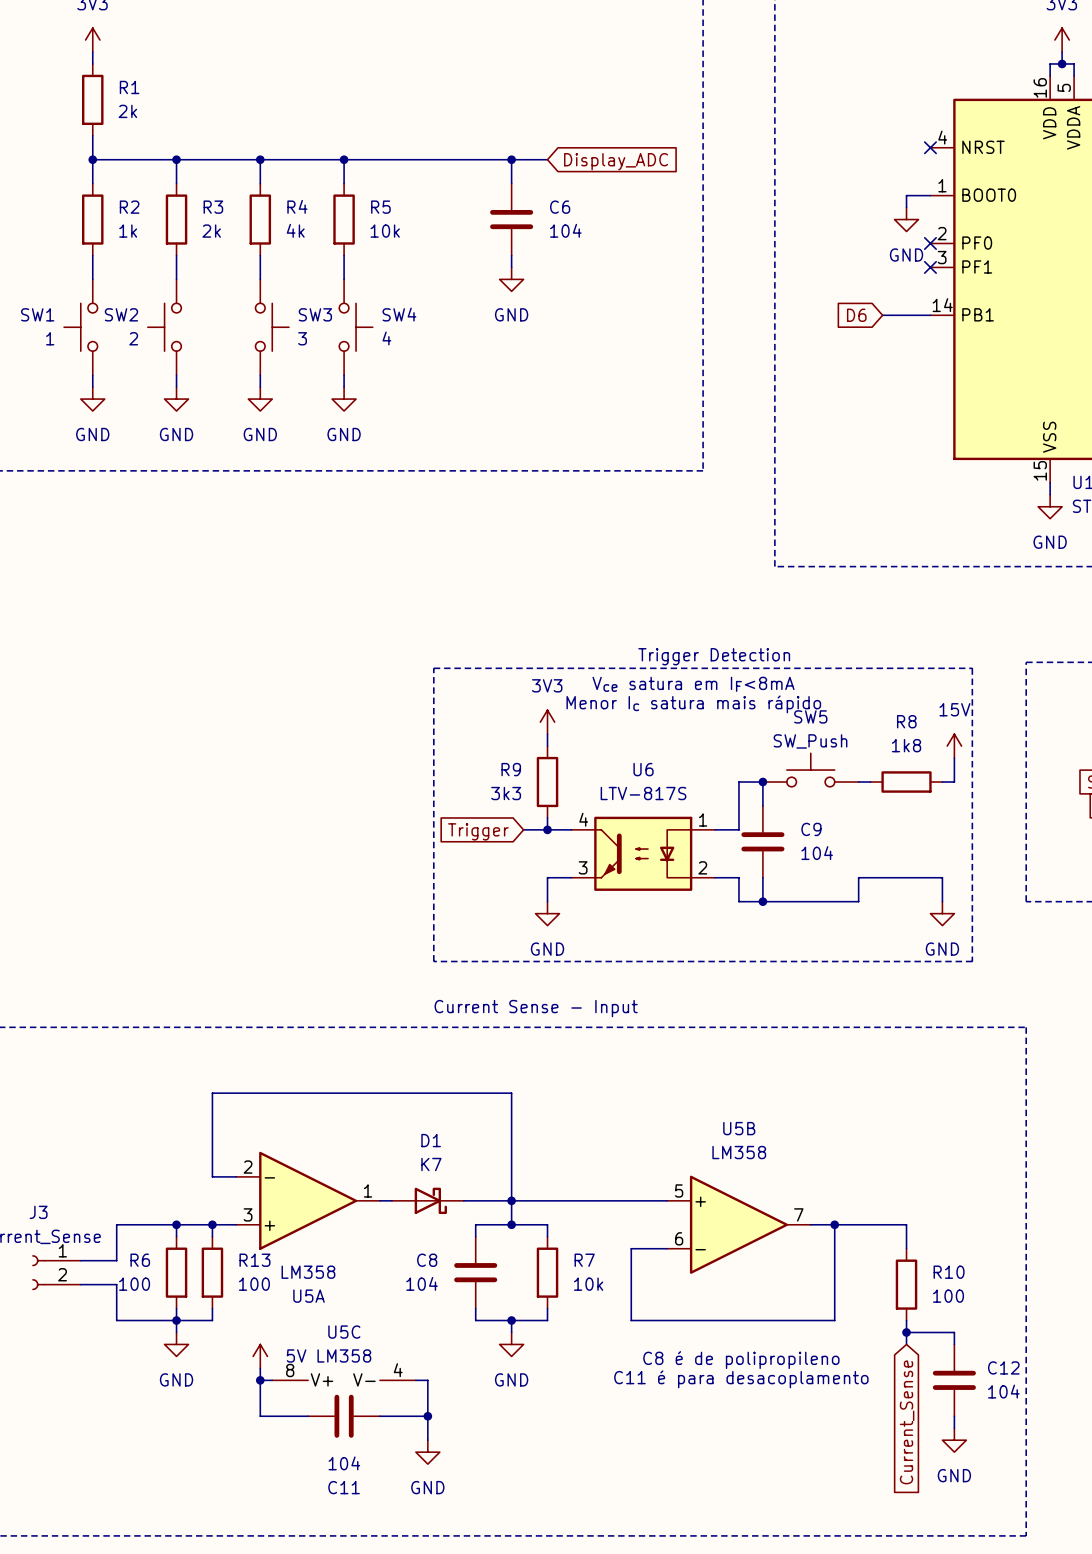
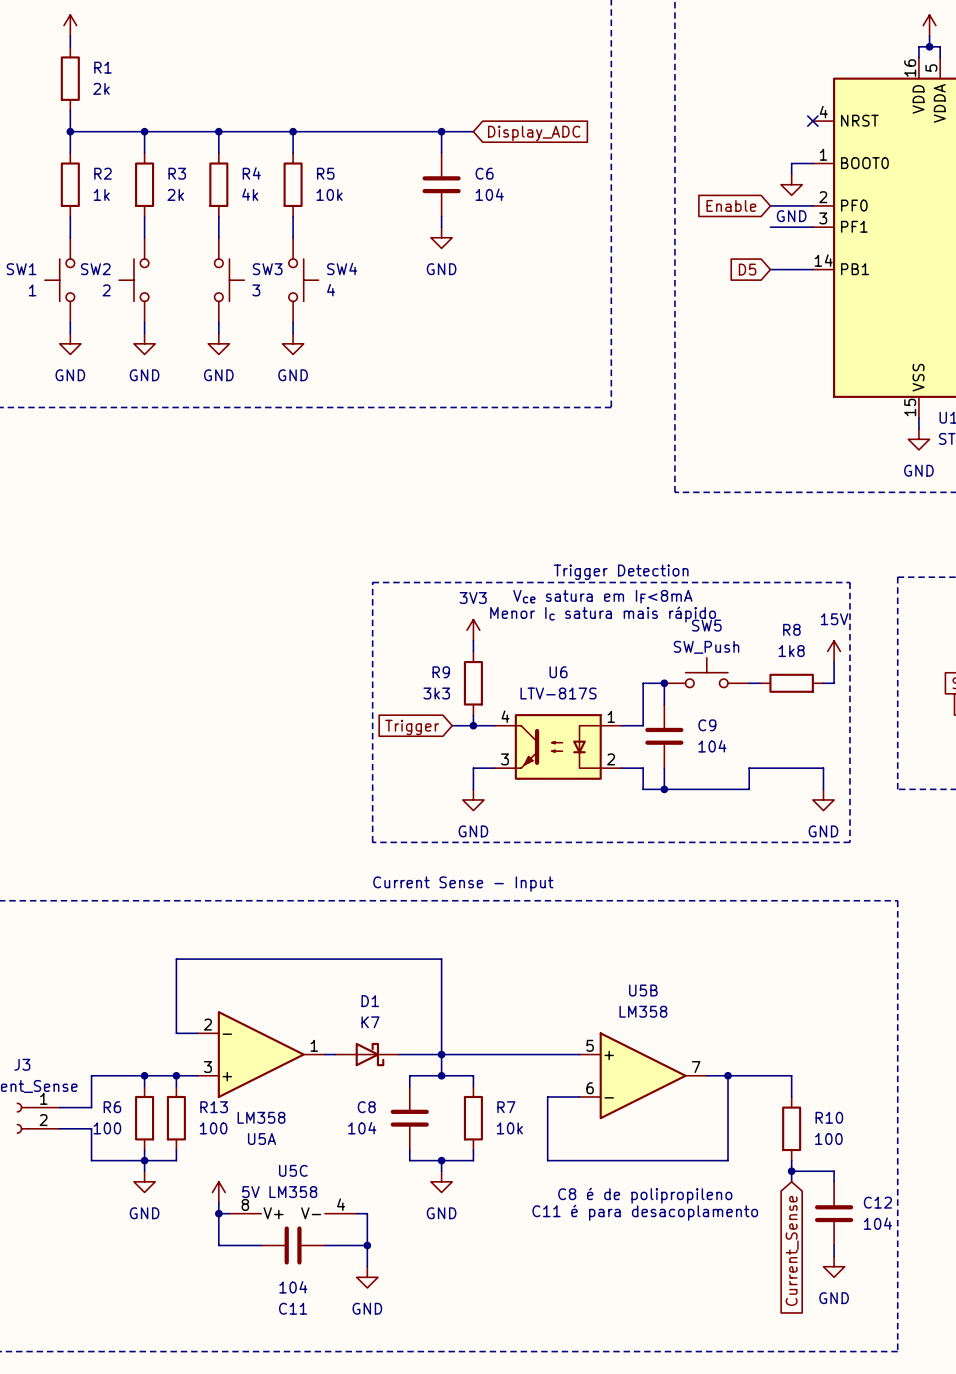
global label: none -> Enable (731, 205)
wire: none -> (770, 205) (812, 205)
no-connect mark: (930, 243) -> none
wire: none -> (770, 227) (812, 227)
no-connect mark: (930, 267) -> none
global label: D6 (856, 315) -> D5 (747, 269)

